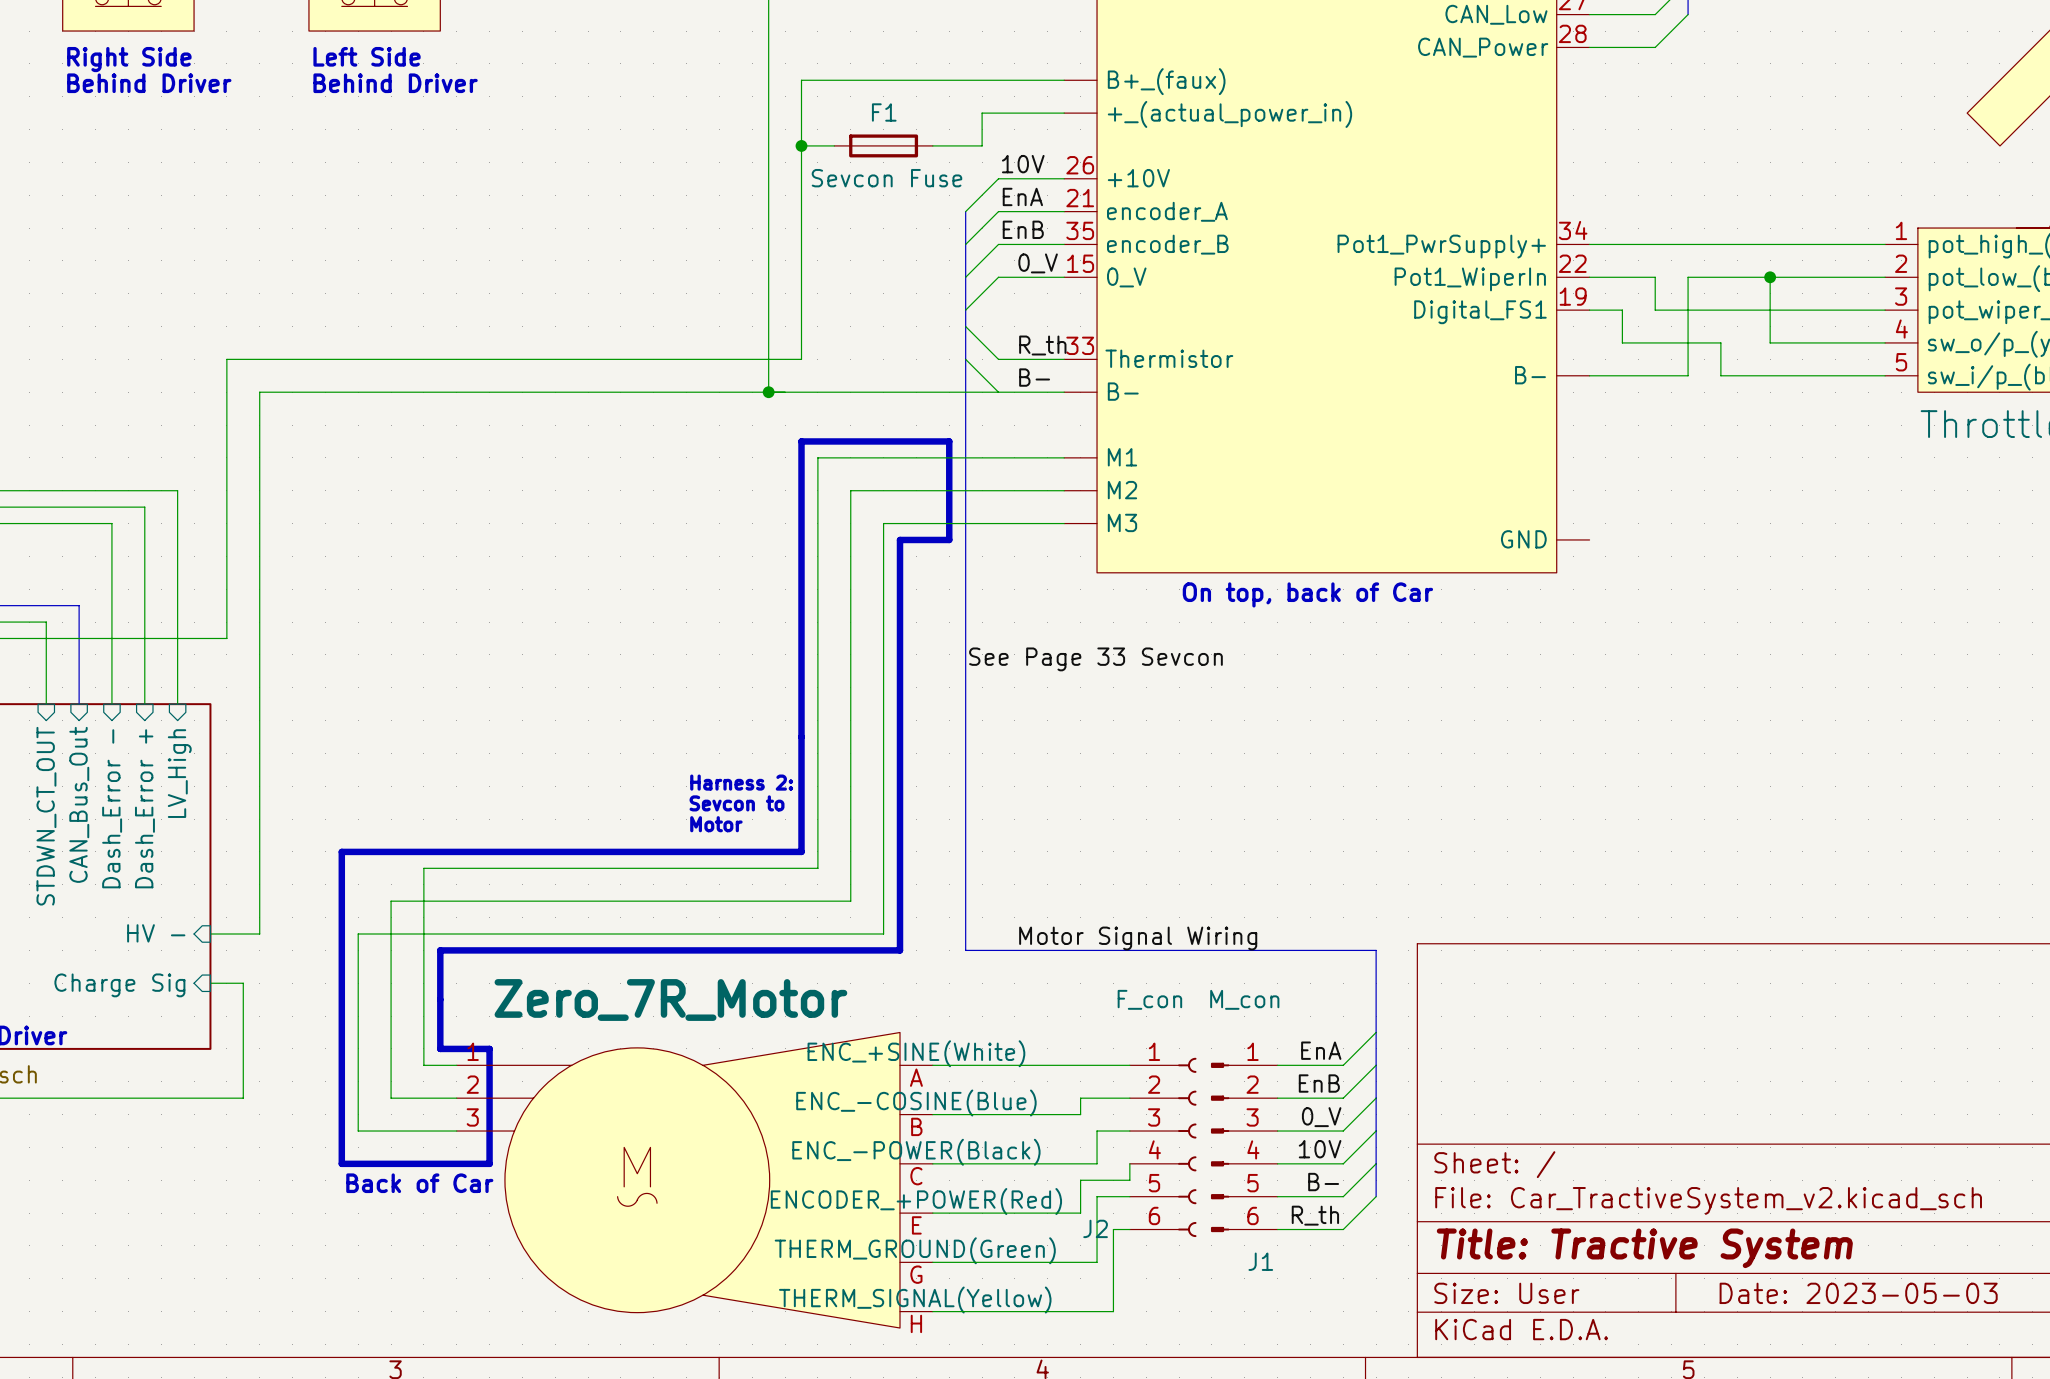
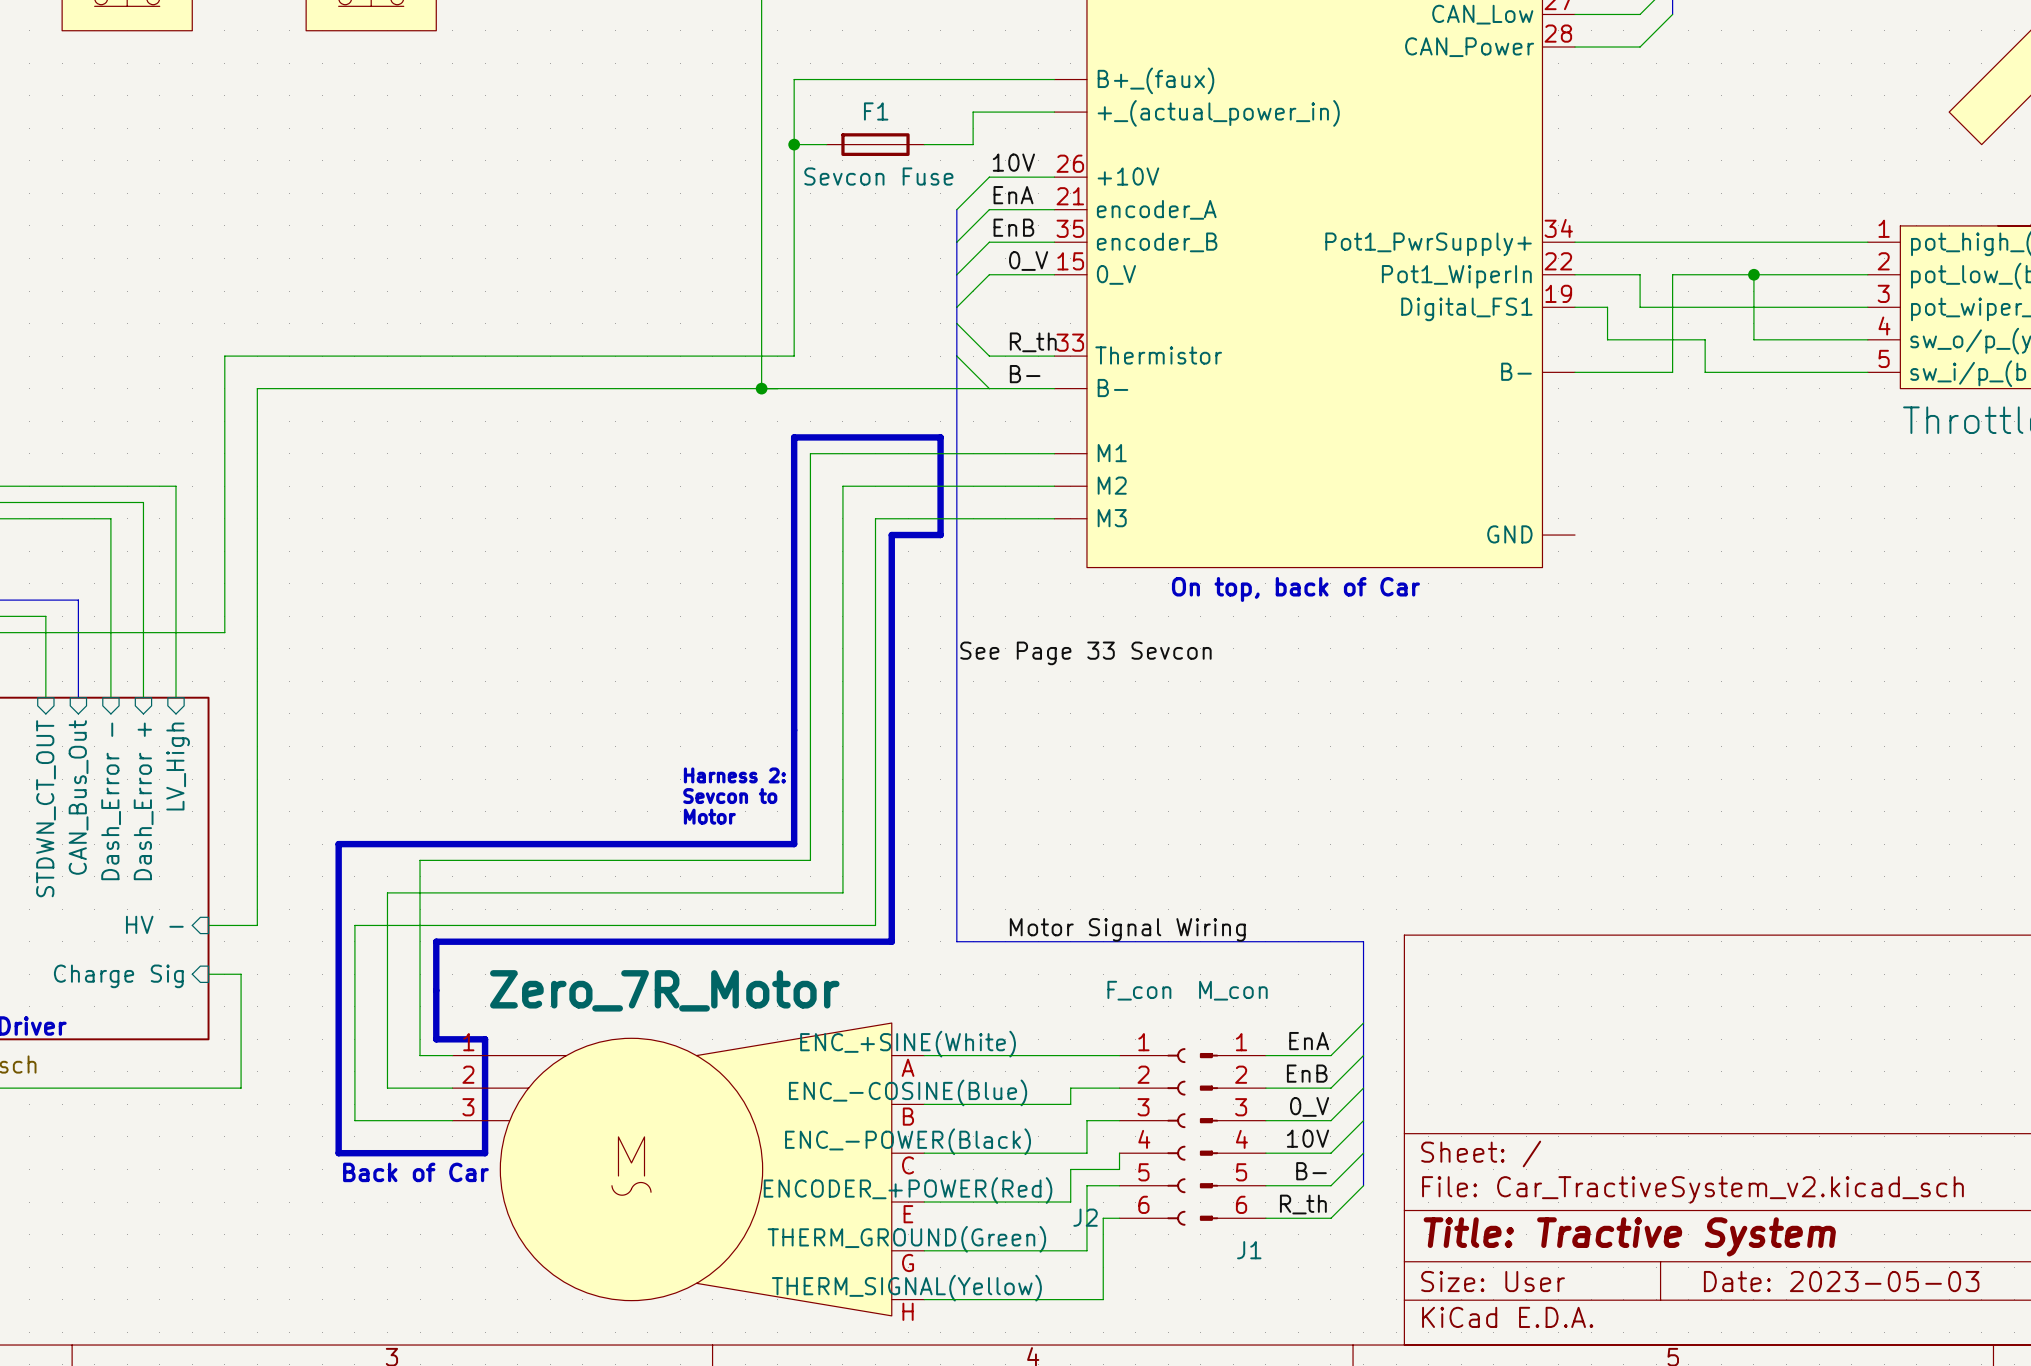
text: Left Side (367, 56) -> none
text: Right Side (129, 59) -> none
text: Behind Driver (149, 83) -> none
text: Behind Driver (395, 83) -> none

